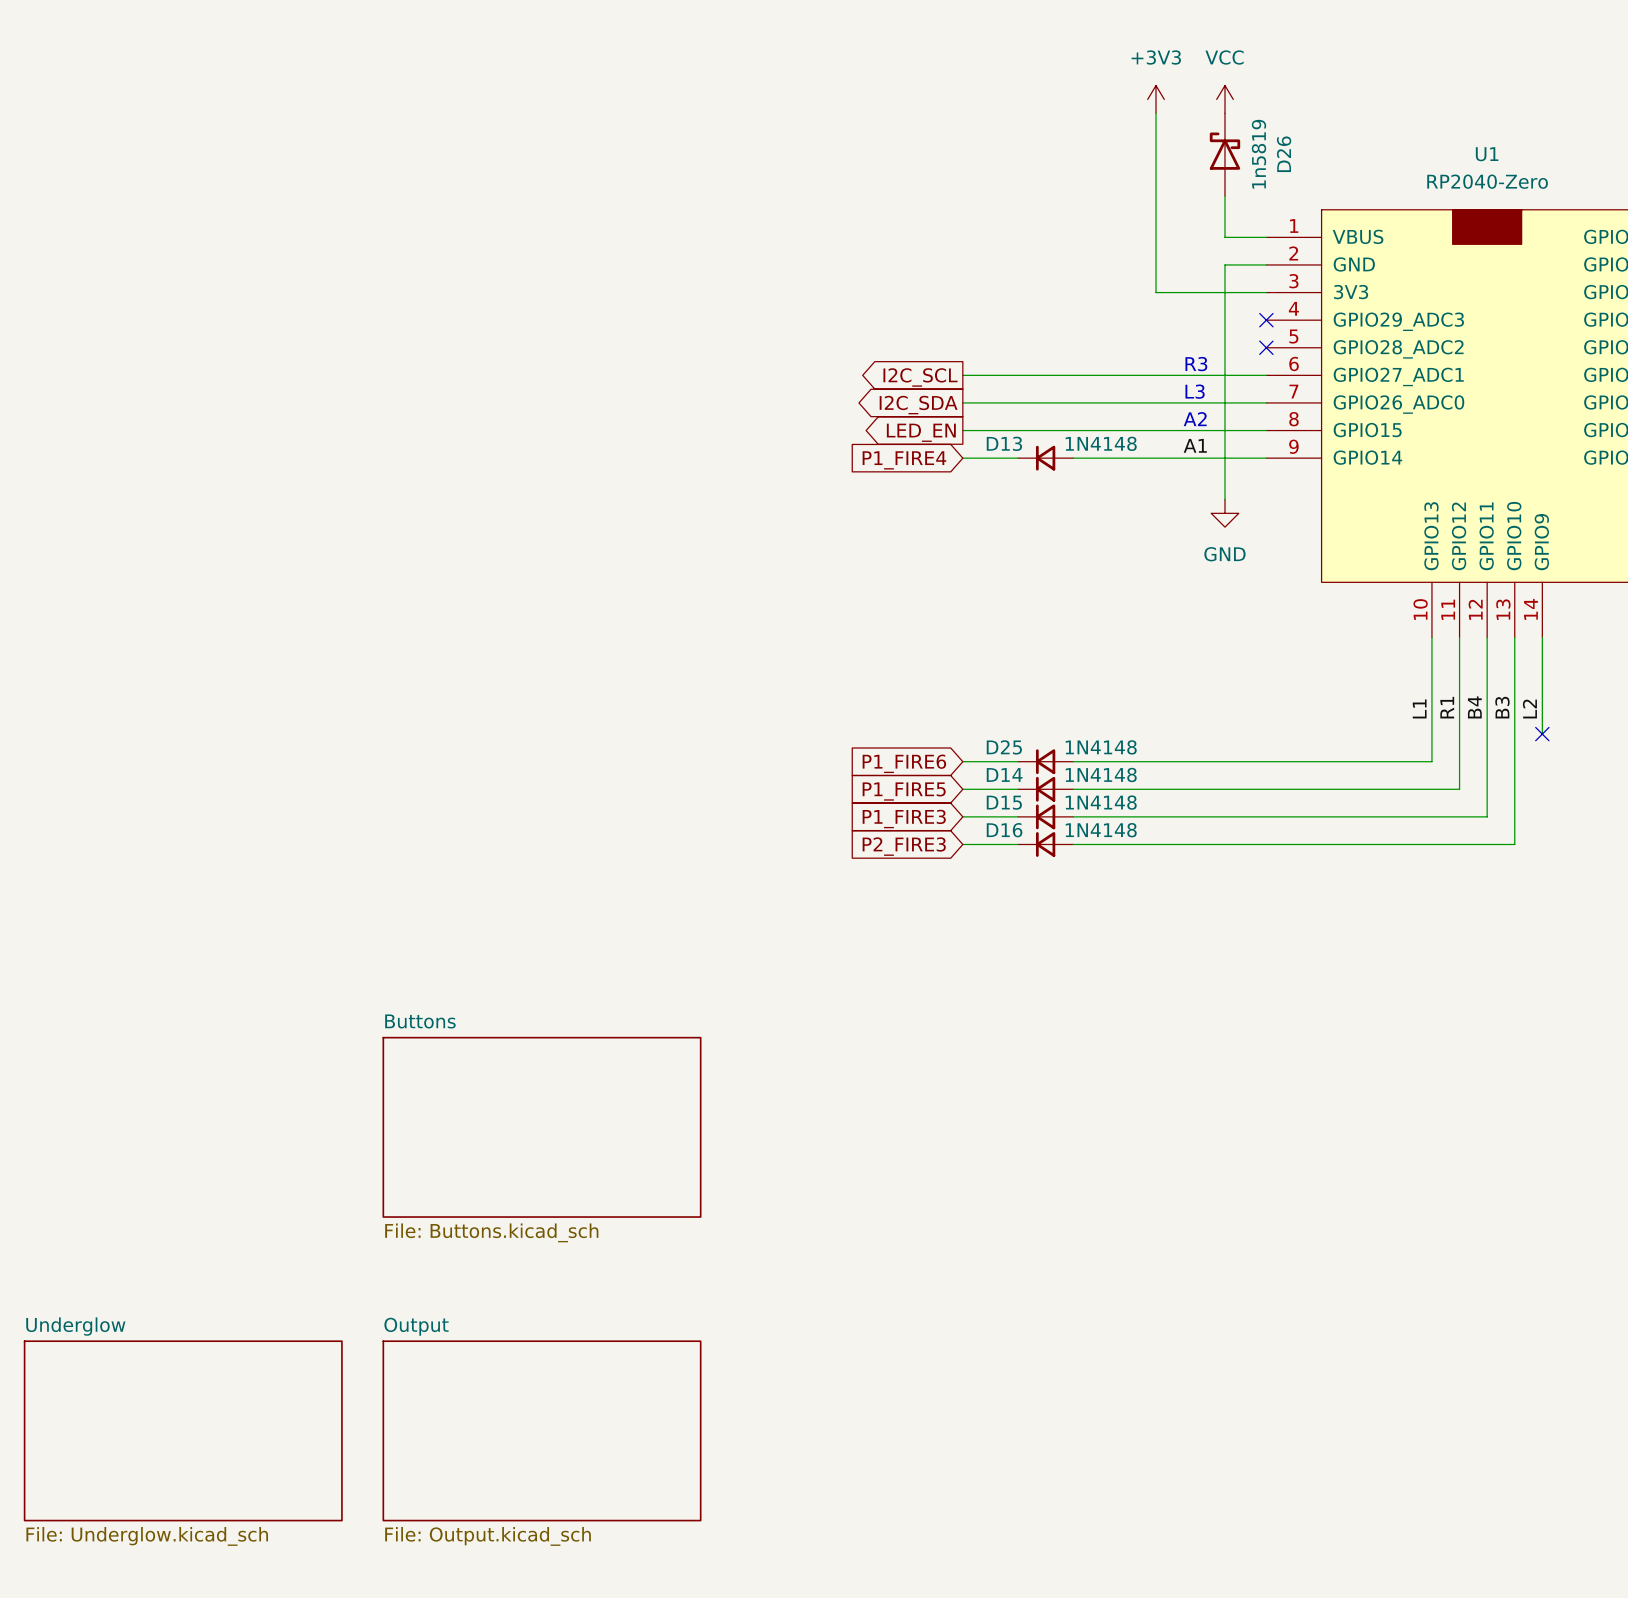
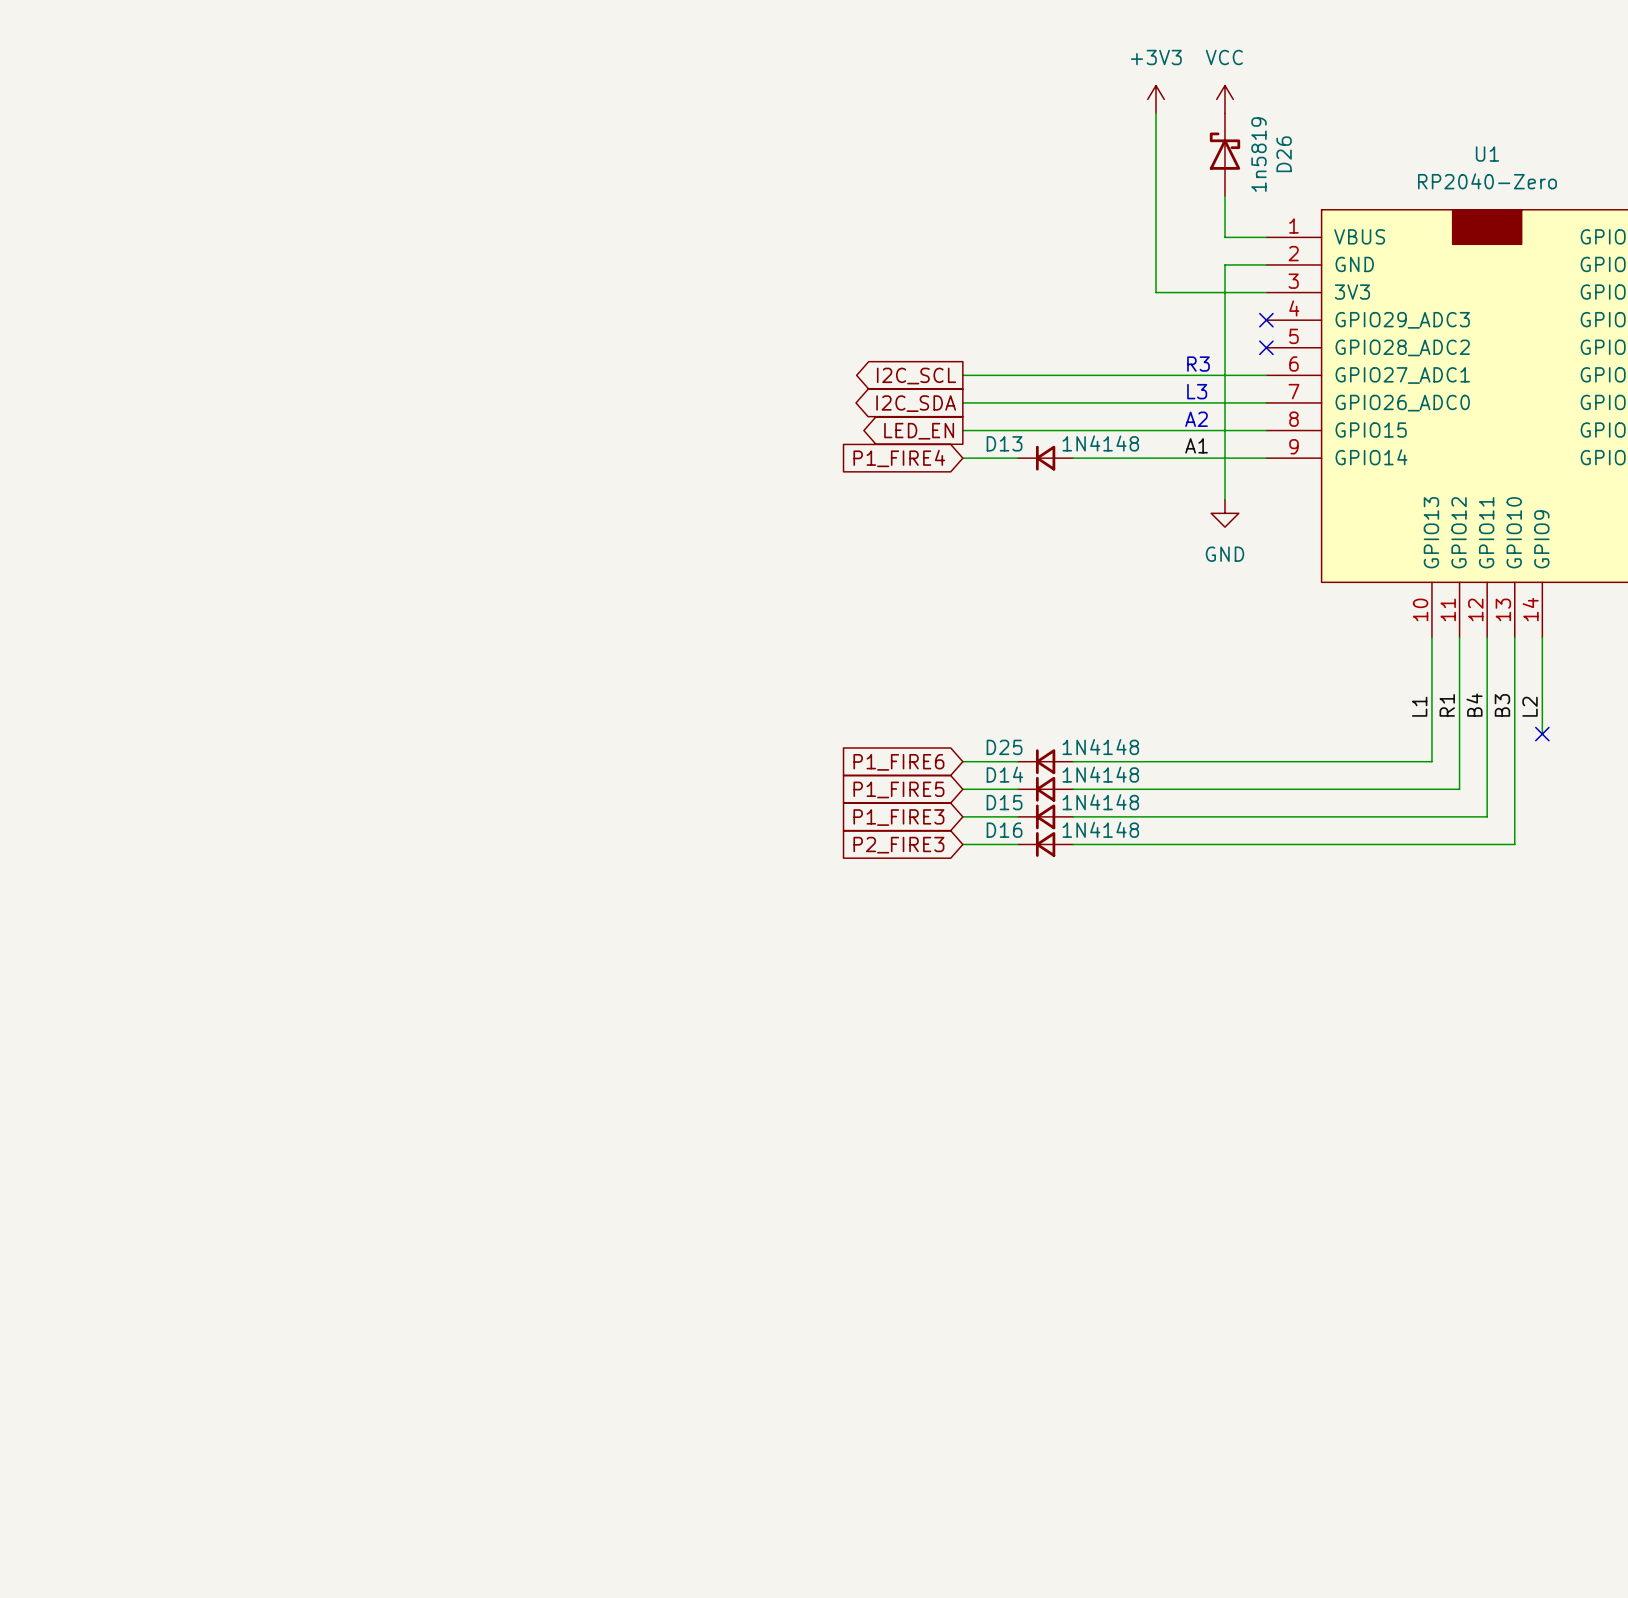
sheet Buttons: File: Buttons.kicad_sch (542, 1127) -> none
sheet Underglow: File: Underglow.kicad_sch (183, 1430) -> none
sheet Output: File: Output.kicad_sch (542, 1430) -> none

